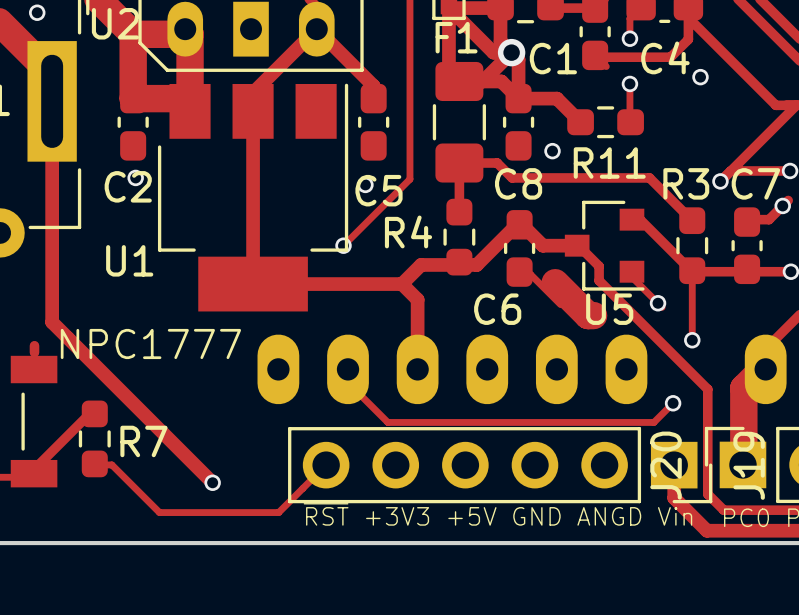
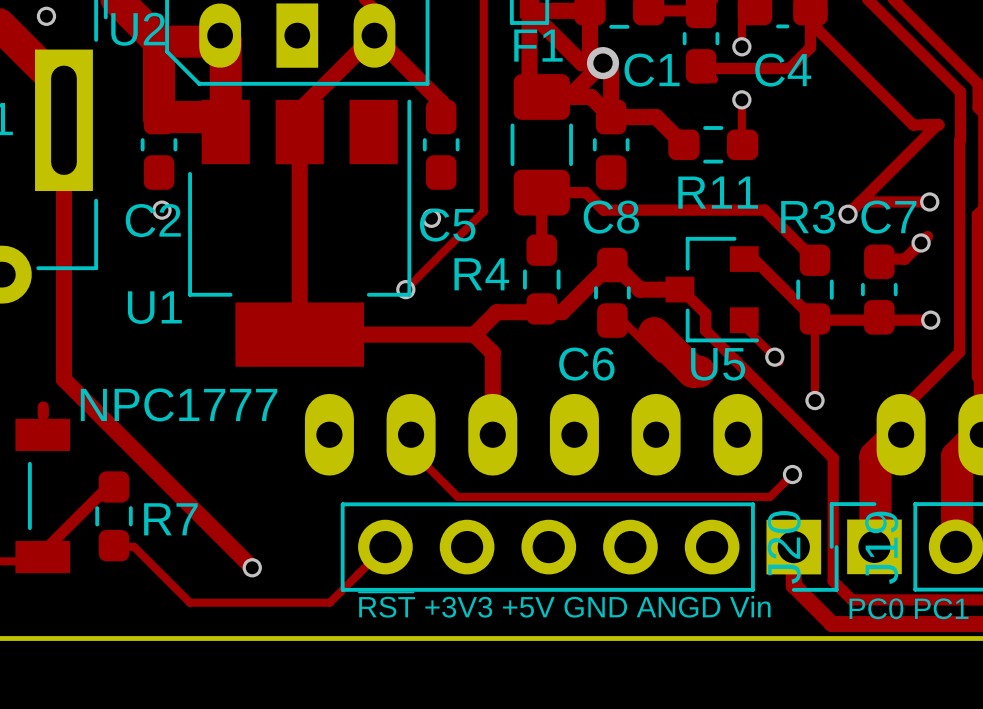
via: (700, 77) -> none
via: (552, 151) -> none

